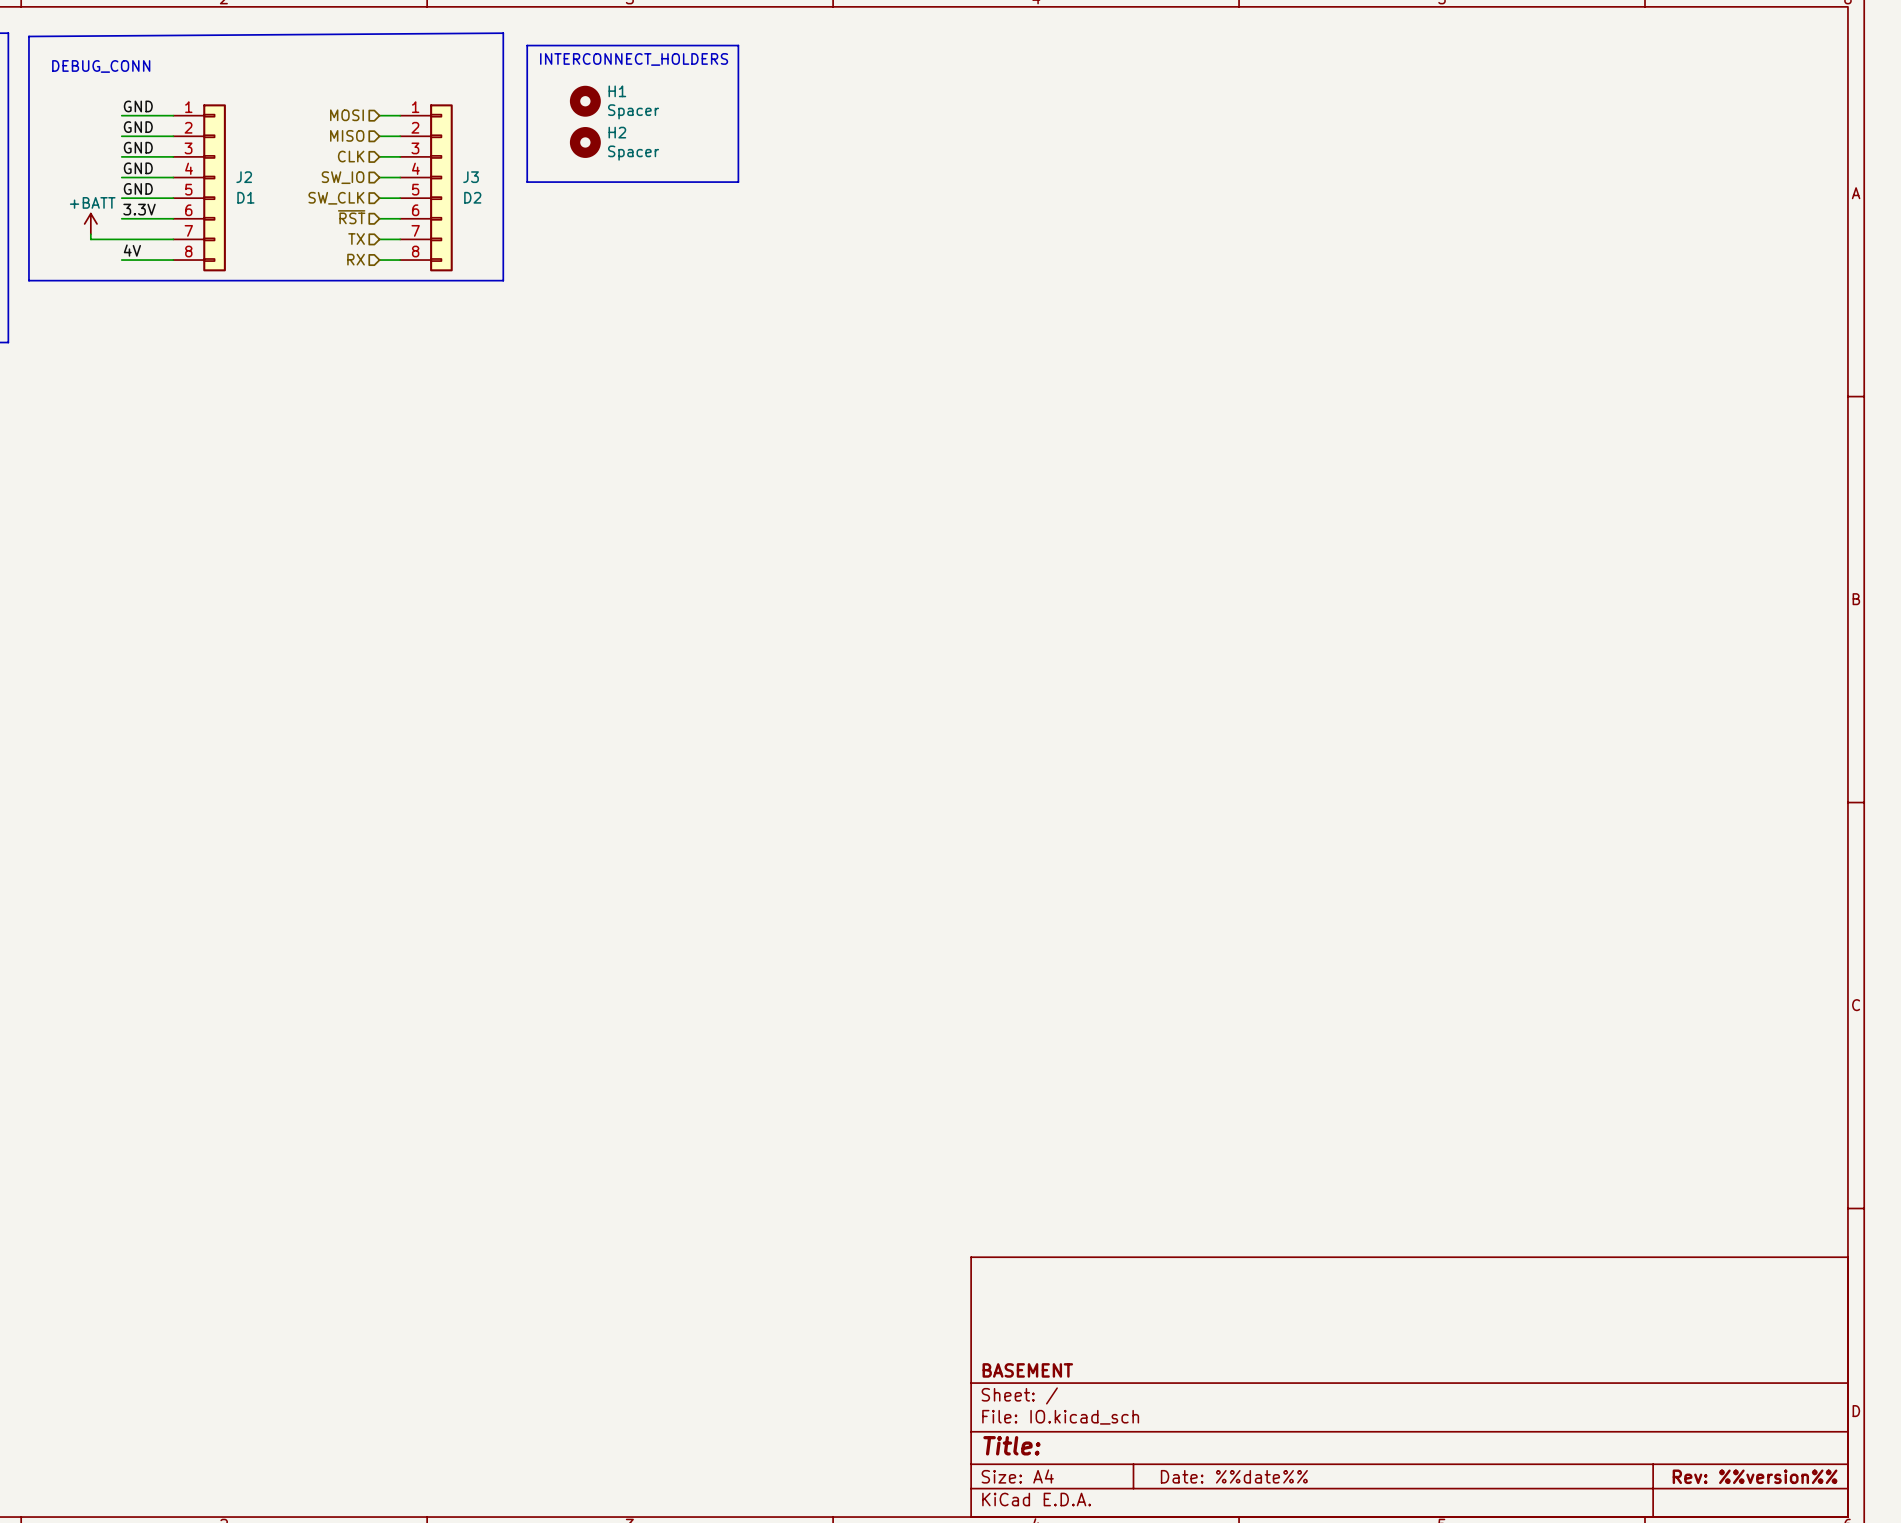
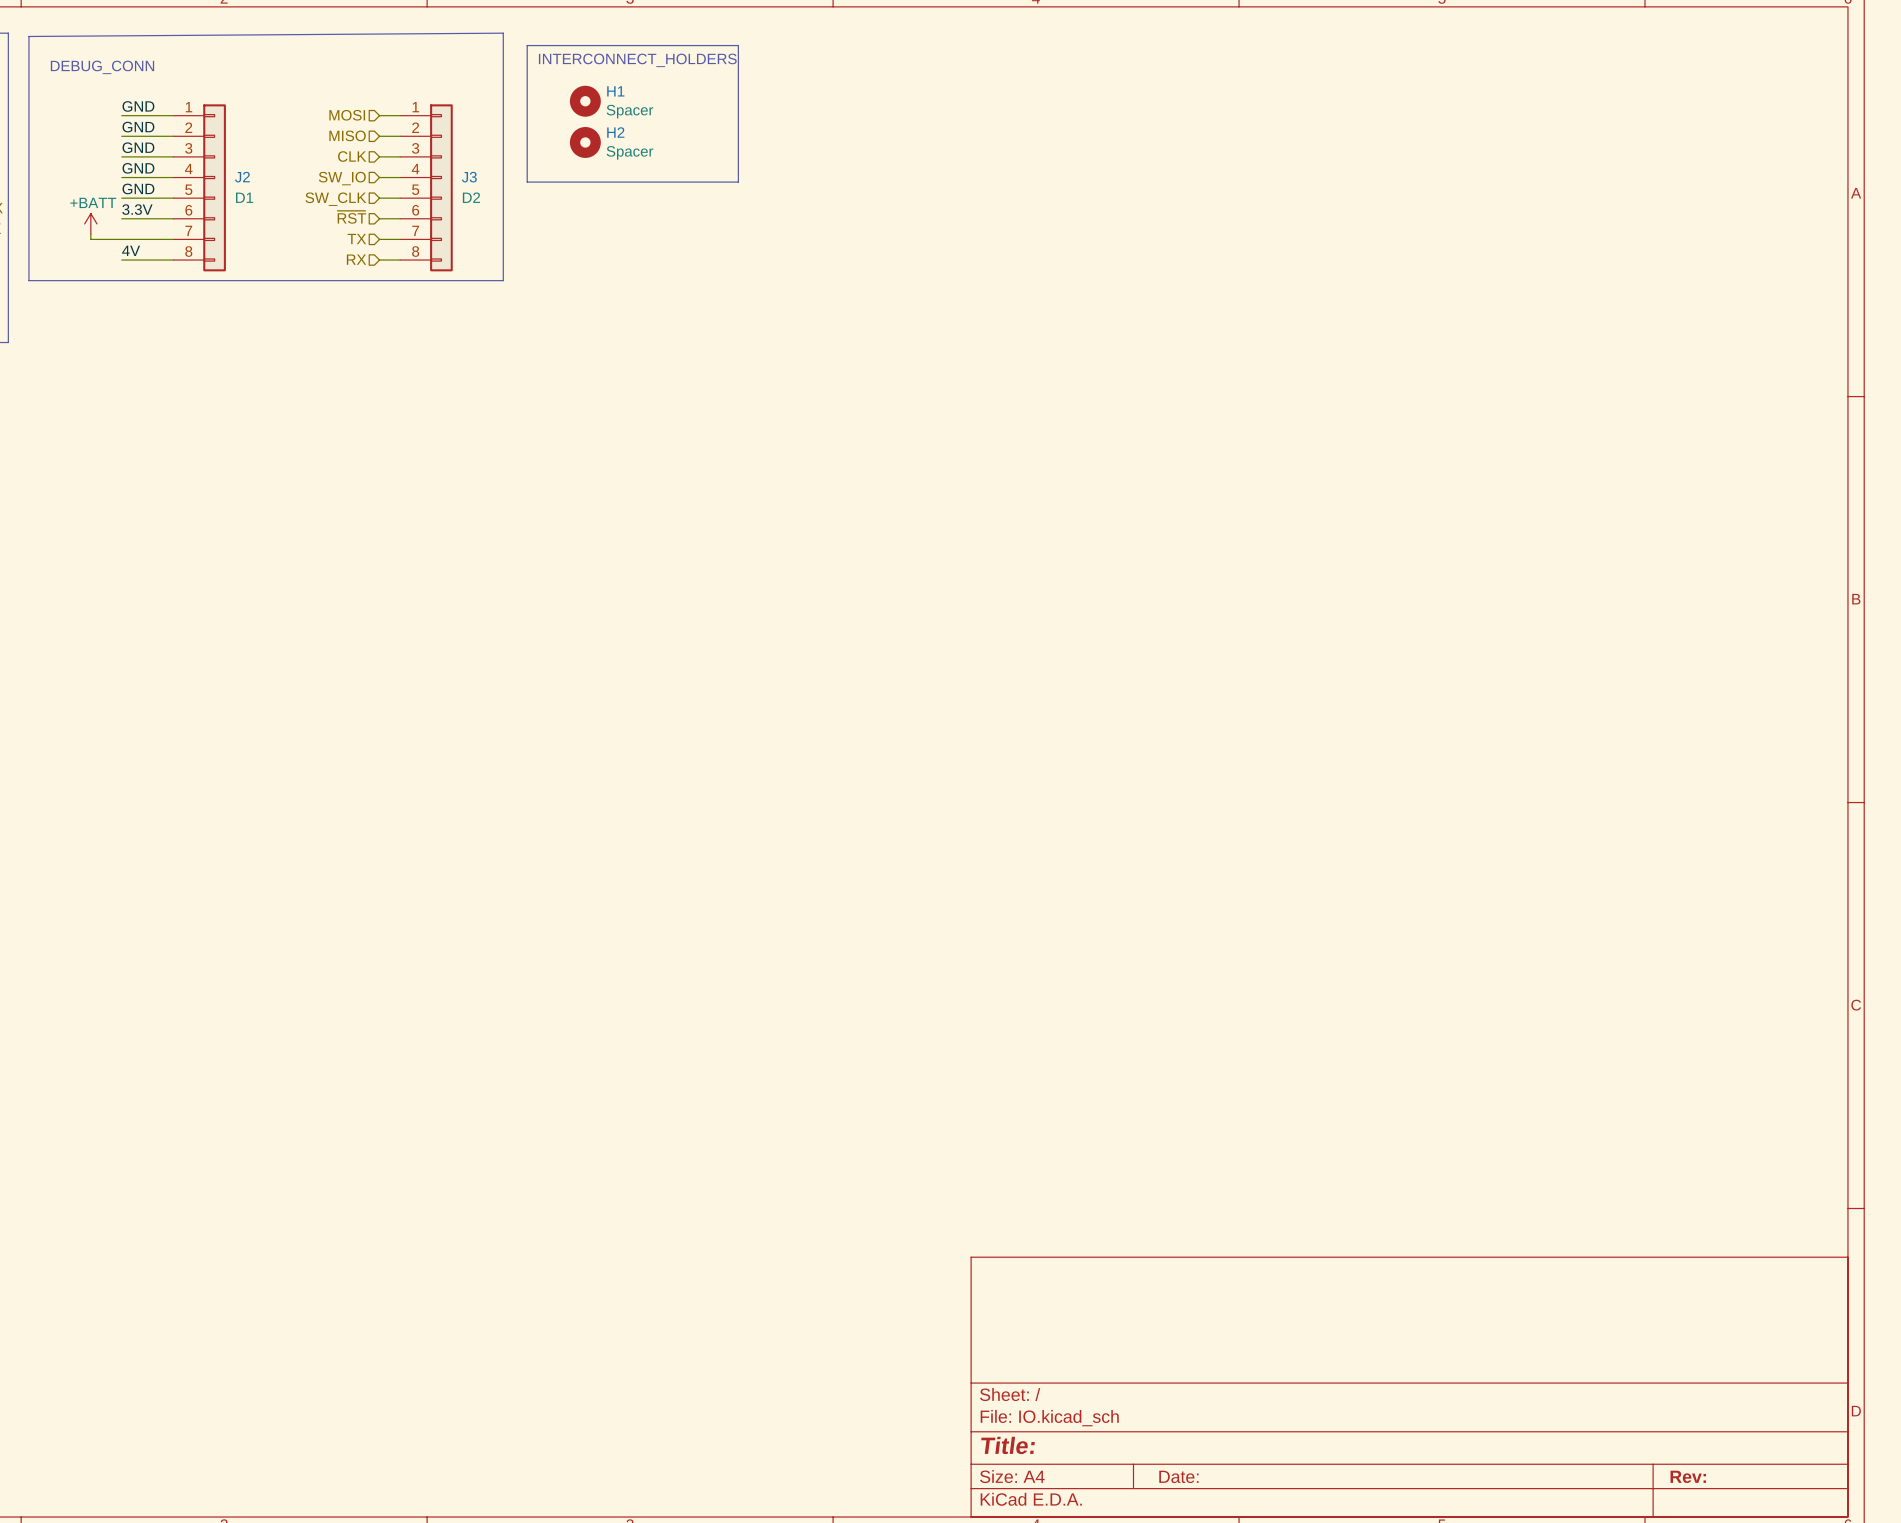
title block: BASEMENT (1027, 1370) -> none
title block: Date: %%date%% (1234, 1476) -> Date: (1178, 1476)
title block: Rev: %%version%% (1755, 1476) -> Rev: (1688, 1476)

